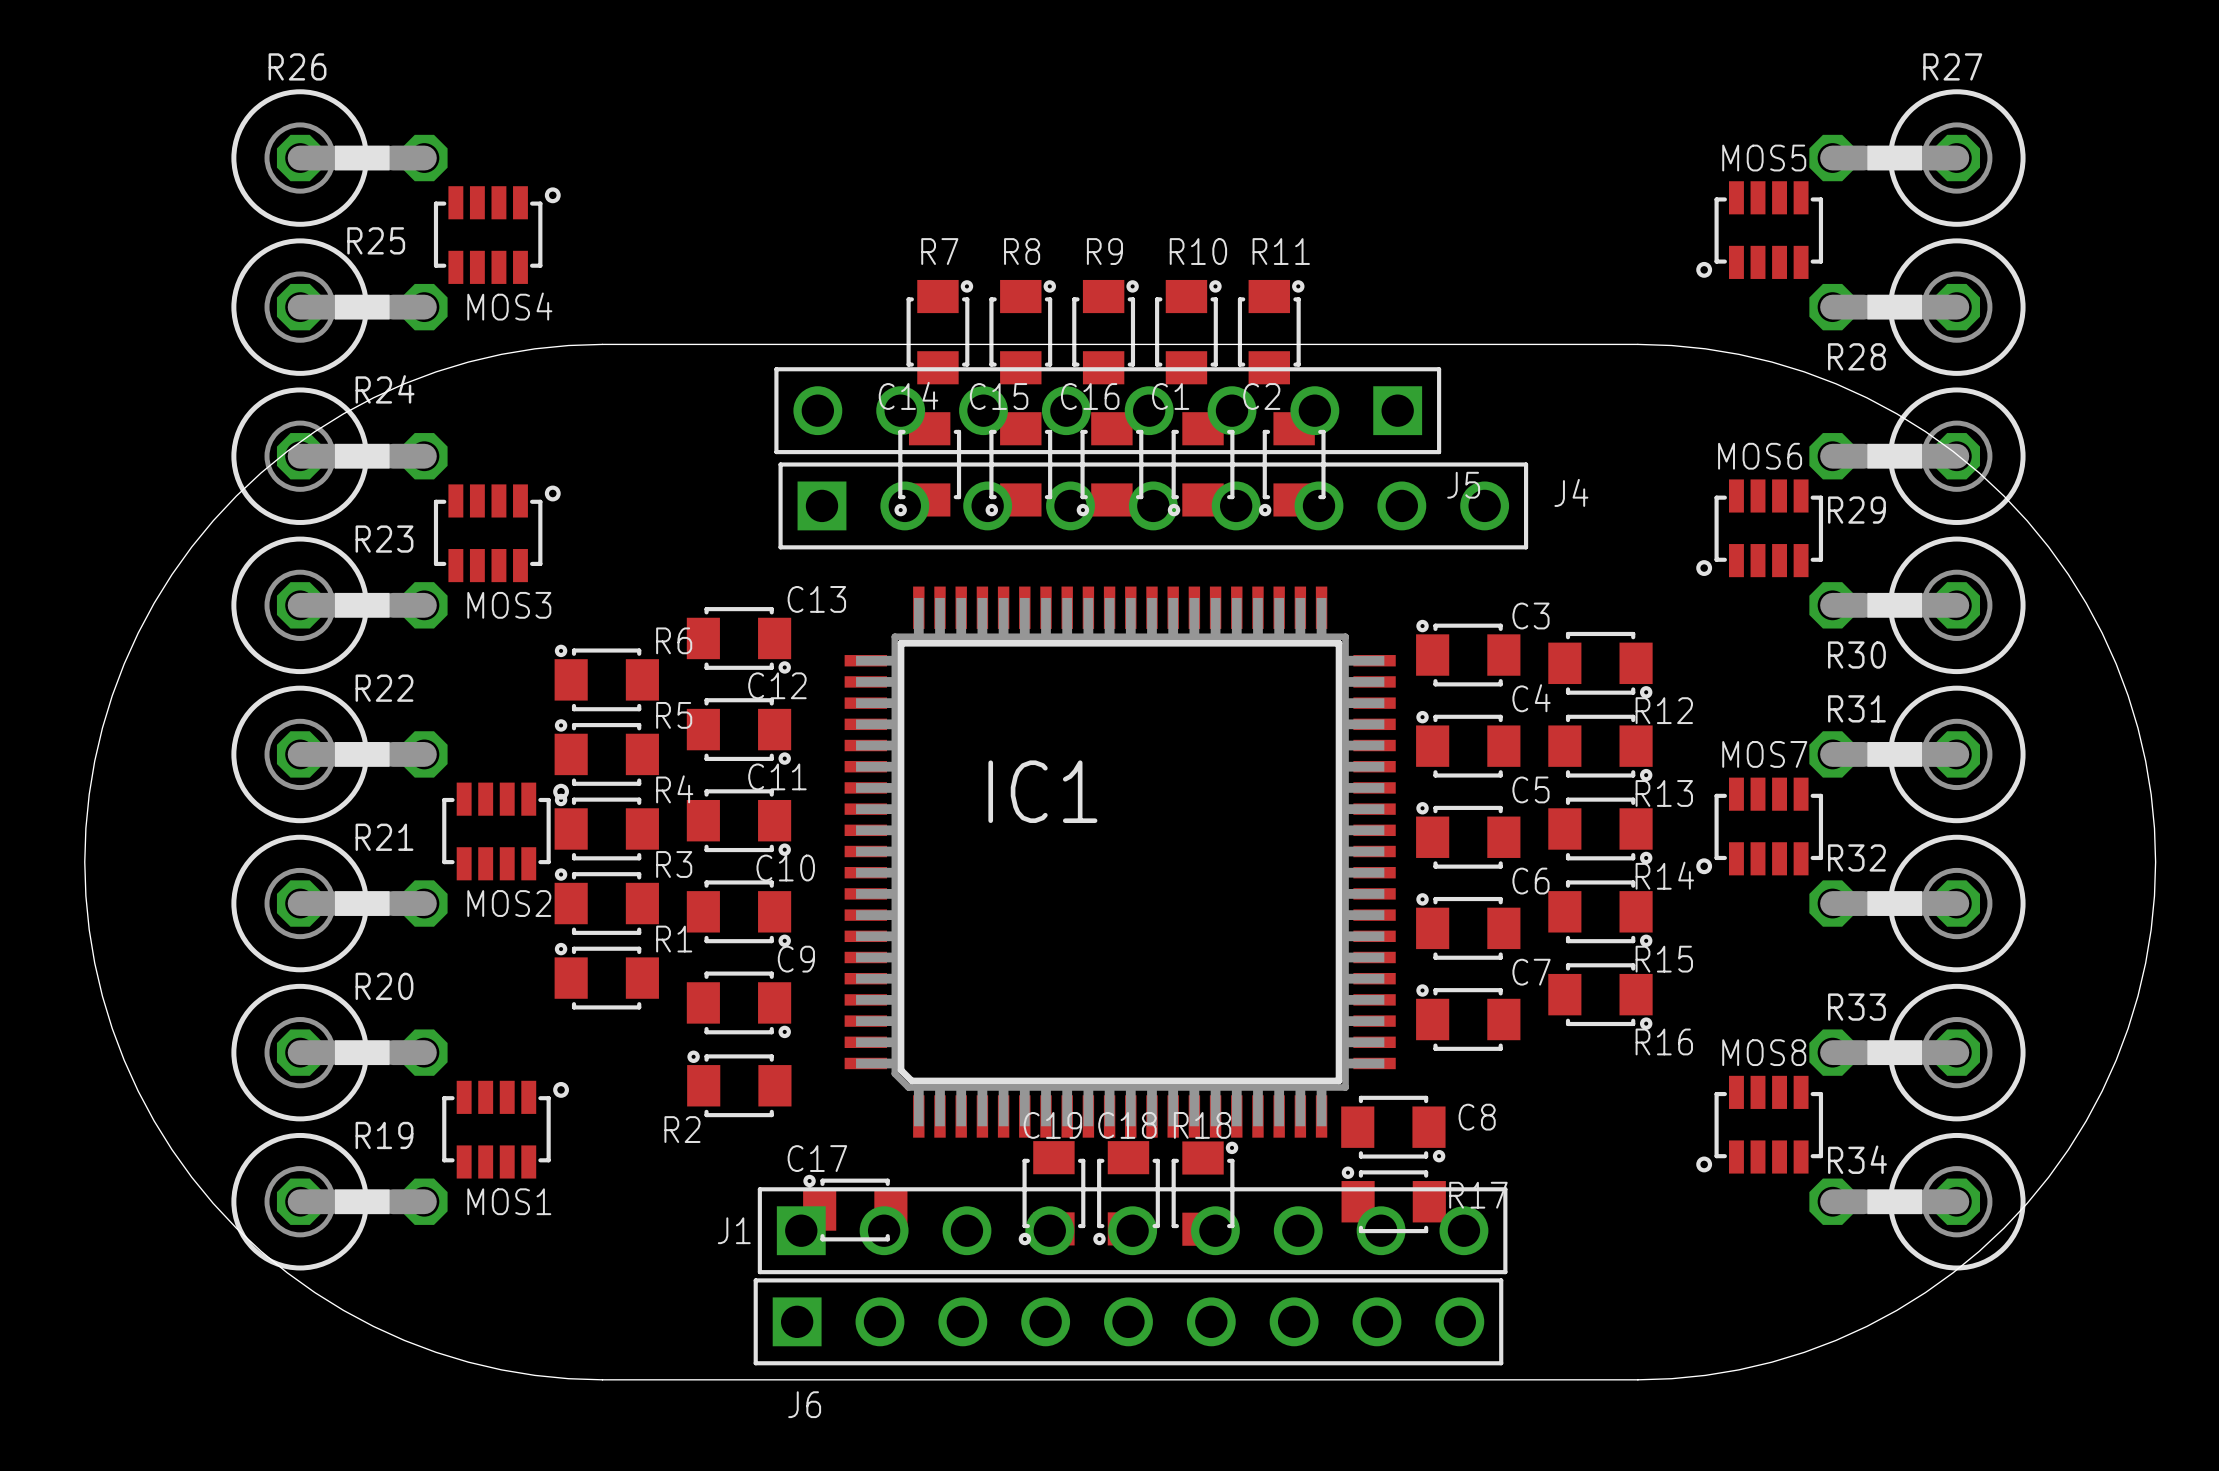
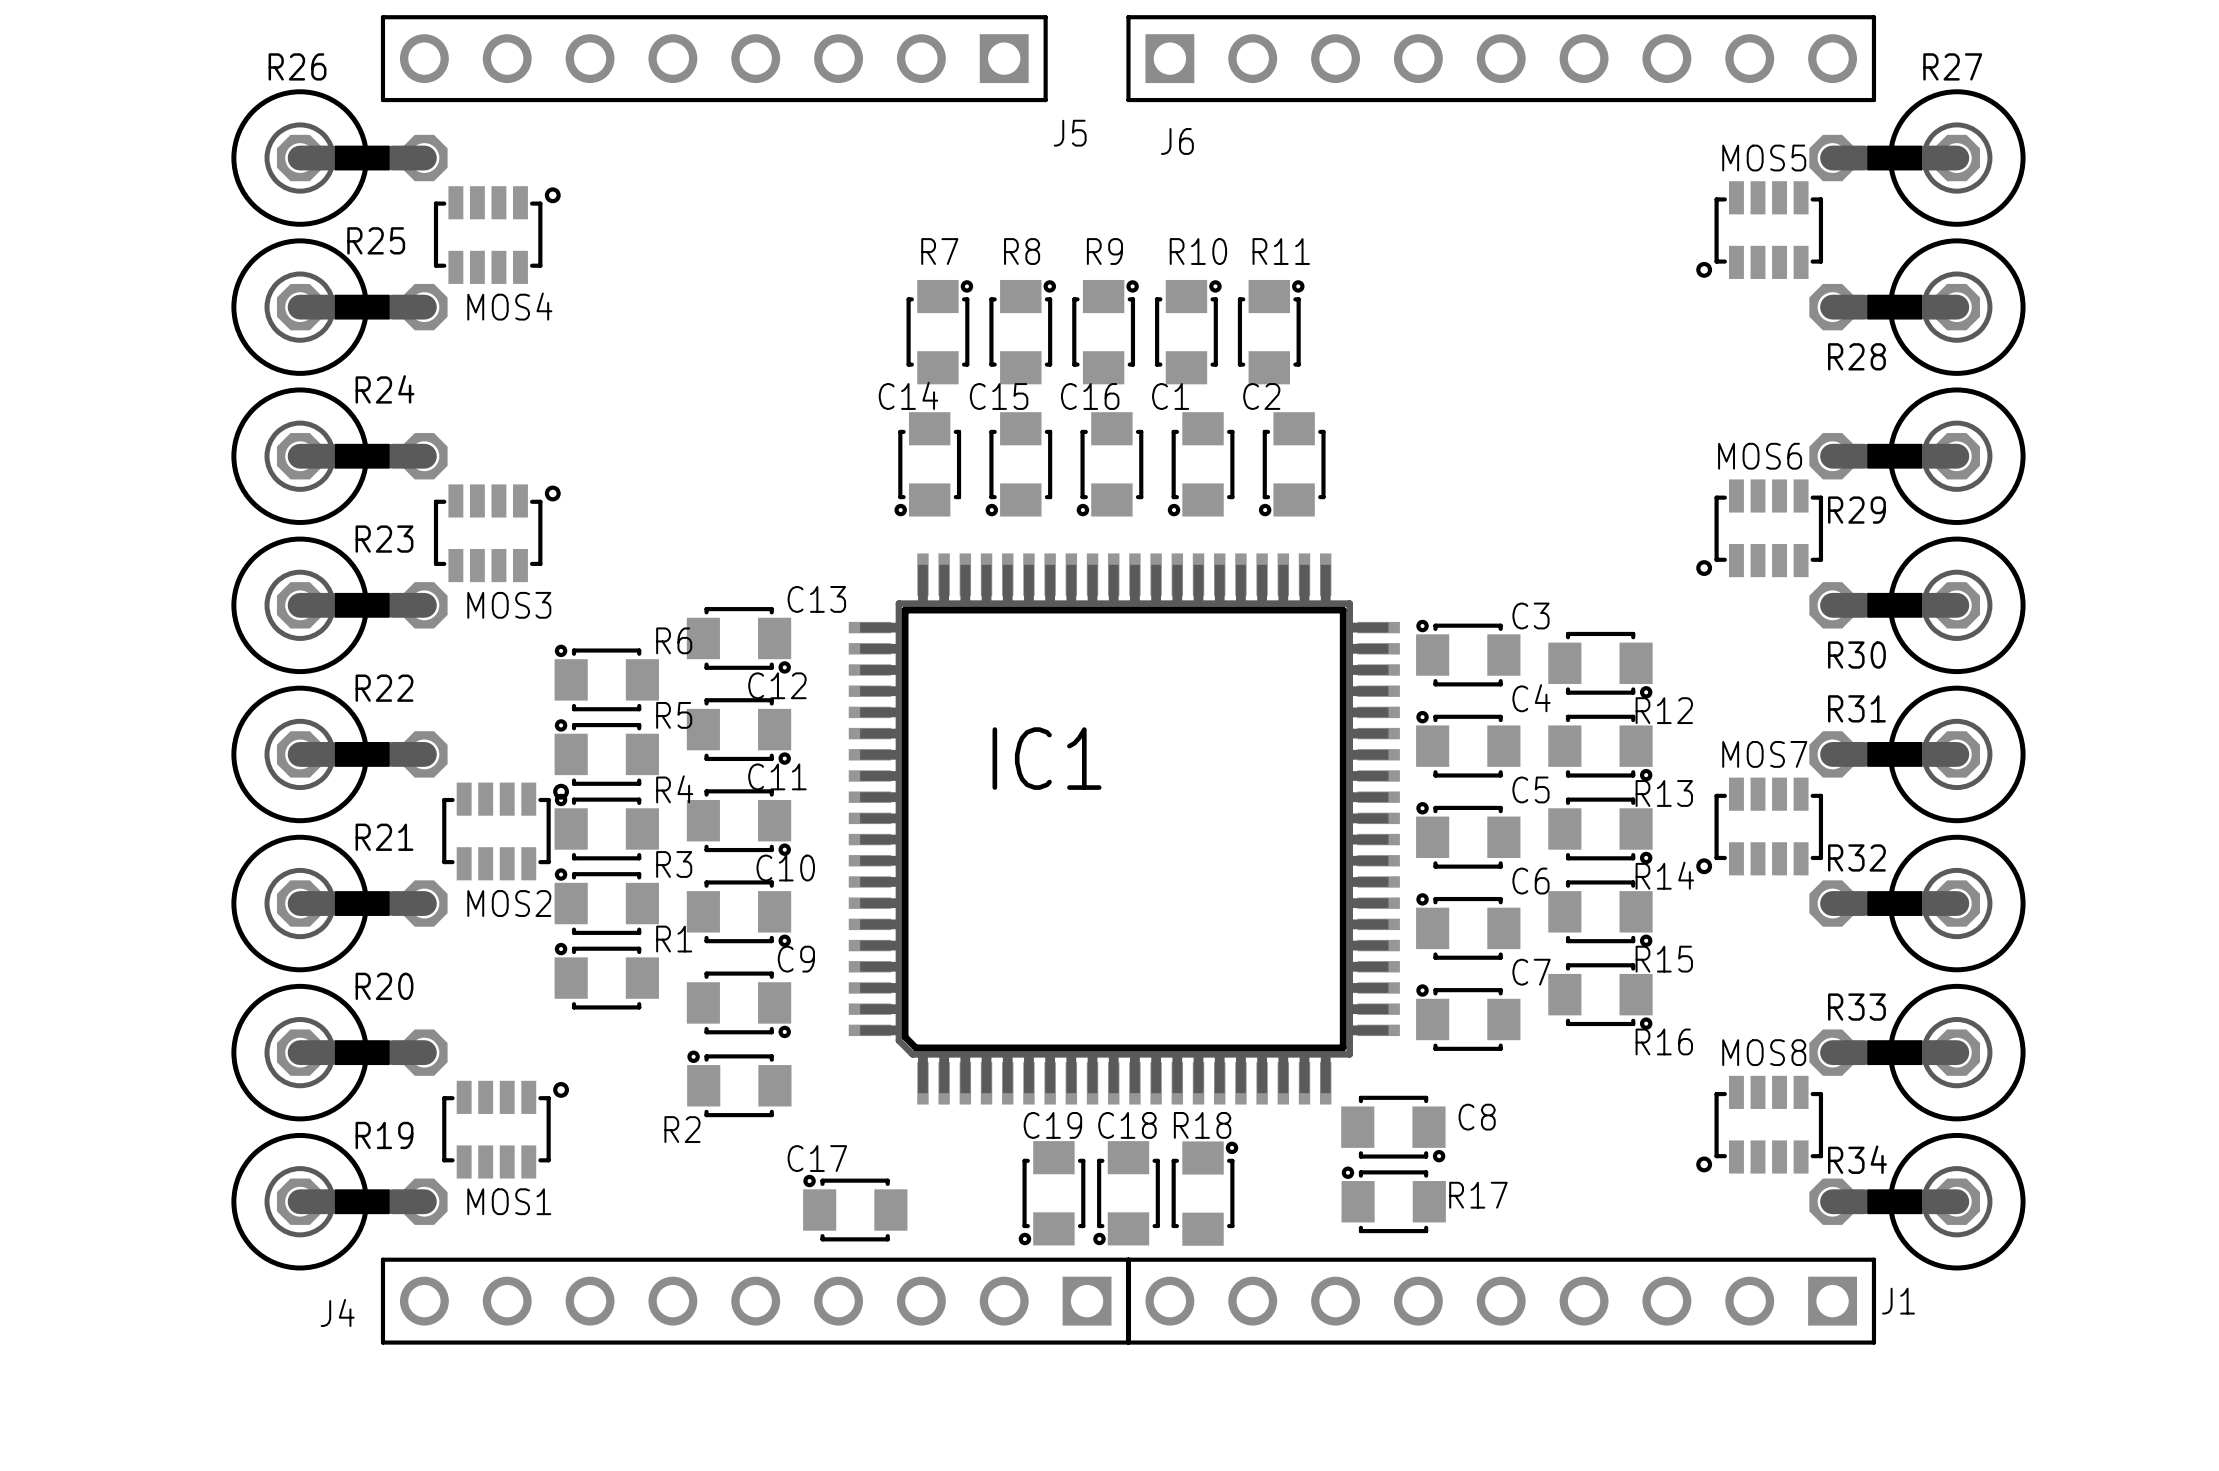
board edge: (602, 344) (1671, 345) (1738, 354) (1771, 362) (1836, 383) (1866, 397) (1896, 413) (1953, 451) (1979, 472) (2027, 520) (2068, 574) (2086, 603) (2102, 633) (2128, 695) (2137, 728) (2151, 794) (2155, 862) (2154, 895) (2145, 963) (2137, 996) (2116, 1060) (2102, 1091) (2068, 1149) (2027, 1203) (1979, 1251) (1925, 1292) (1896, 1310) (1836, 1340) (1771, 1362) (1705, 1375) (1637, 1379) (568, 1378) (501, 1369) (468, 1362) (404, 1340) (373, 1326) (314, 1292) (261, 1251) (236, 1228) (213, 1203) (172, 1149) (138, 1091) (124, 1060) (102, 996) (89, 929) (84, 862) (89, 794) (94, 761) (102, 728) (124, 663) (154, 603) (172, 574) (213, 520) (261, 472) (314, 431) (343, 413) (404, 383) (468, 362) (501, 354) (534, 348) (602, 344) -> none
J5 position: (1107, 410) -> (714, 58)
J4 rotation: 0° (1153, 505) -> 180° (755, 1301)
J4 position: (1153, 505) -> (755, 1301)
IC1 position: (1120, 862) -> (1124, 828)
J1 rotation: 0° (1132, 1230) -> 180° (1501, 1301)
J6 position: (1128, 1321) -> (1501, 58)

